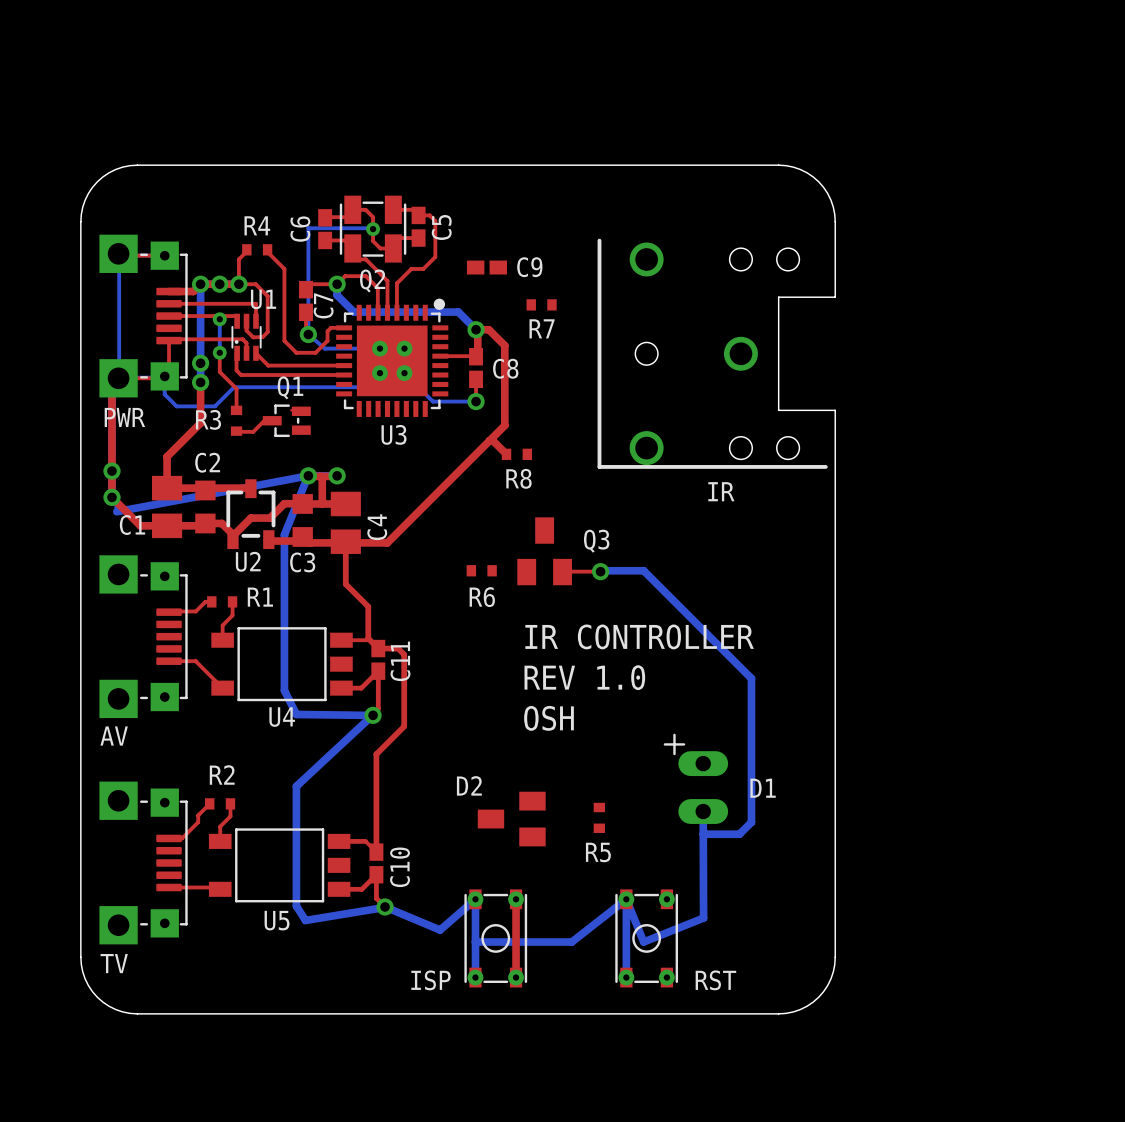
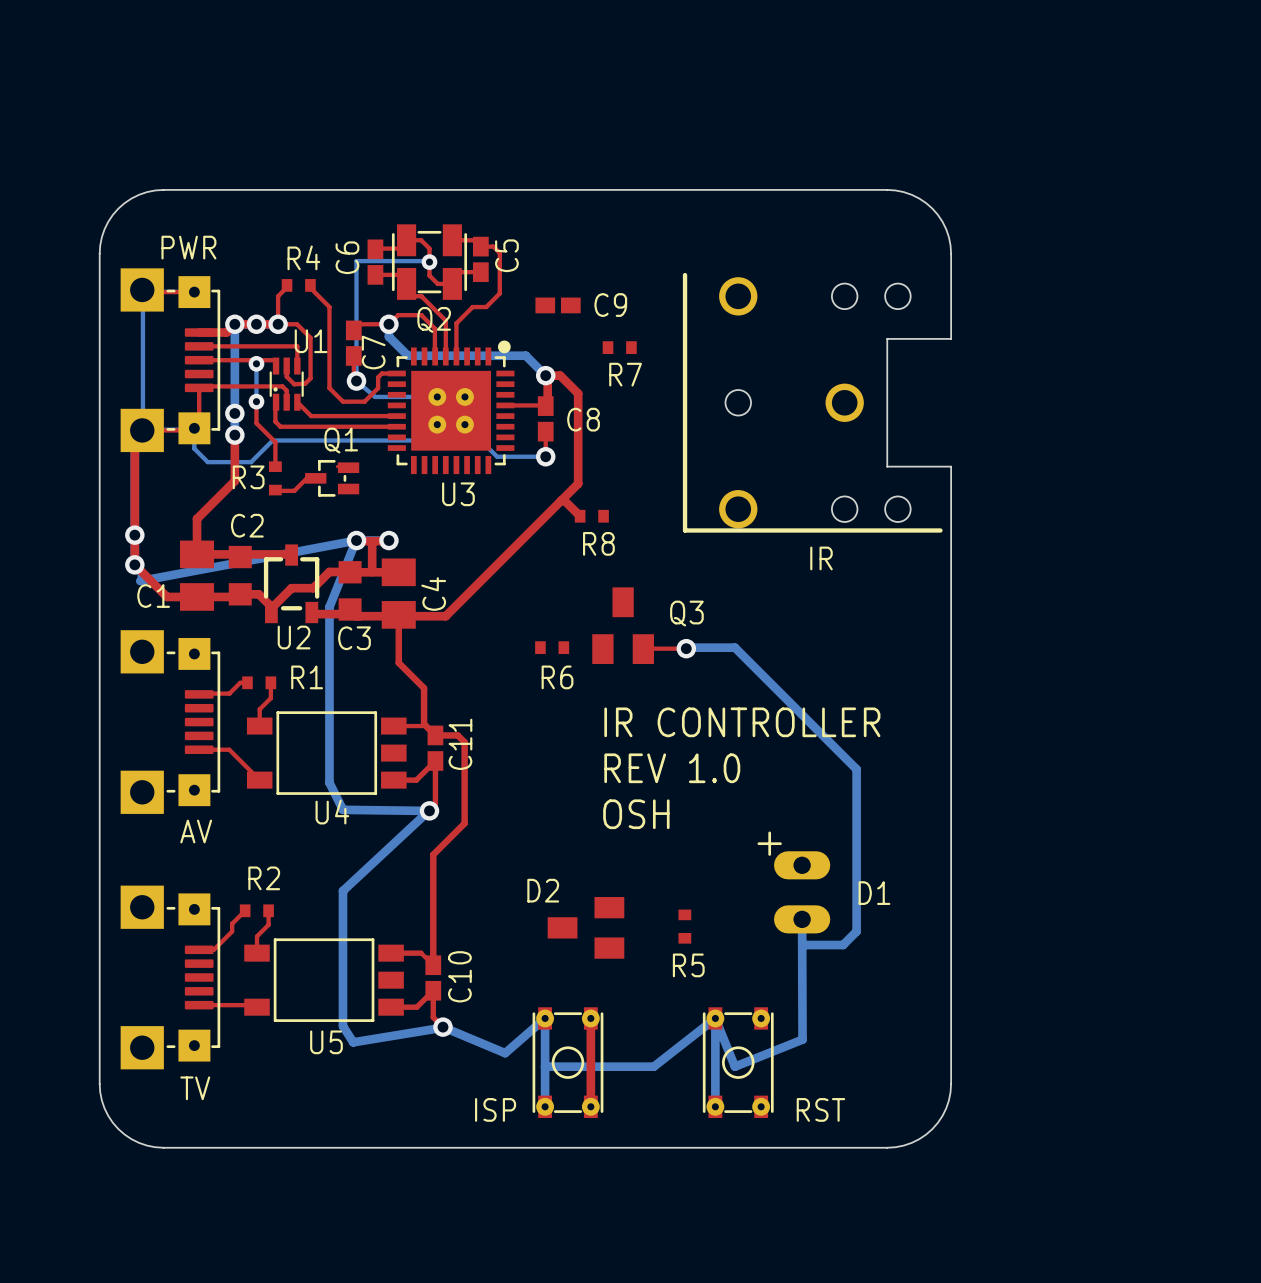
text position: PWR (124, 417) -> PWR (188, 247)
text position: AV (114, 736) -> AV (196, 831)
text position: TV (114, 963) -> TV (195, 1088)

